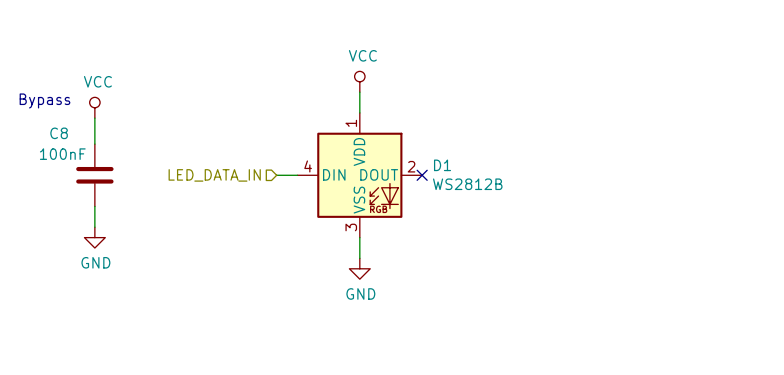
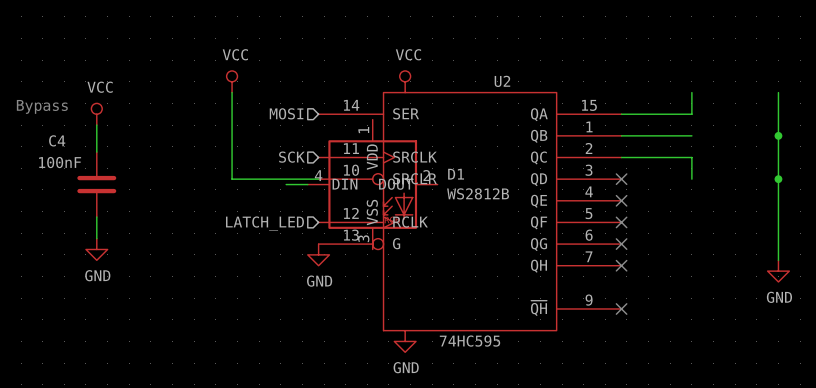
power symbol: none -> VCC (232, 81)
power symbol position: VCC (359, 81) -> VCC (405, 81)
wire: none -> (232, 92) (232, 179) (318, 179)
wire: none -> (691, 92) (691, 114) (621, 114)
wire: none -> (778, 92) (778, 260)
wire: (359, 92) (359, 112) -> none
hierarchical label: none -> MOSI (286, 113)
wire: none -> (621, 135) (691, 135)
junction: none -> (778, 135)
C8 name: C8 (59, 133) -> C4 (57, 140)
hierarchical label: none -> SCK (291, 157)
wire: none -> (621, 157) (691, 157) (691, 179)
no-connect mark: none -> (621, 179)
junction: none -> (778, 179)
hierarchical label: LED_DATA_IN (214, 175) -> none
no-connect mark: (422, 175) -> none
no-connect mark: none -> (621, 200)
U2: none -> 74HC595 (470, 211)
hierarchical label: none -> LATCH_LED (264, 223)
no-connect mark: none -> (621, 222)
no-connect mark: none -> (621, 244)
wire: (359, 237) (359, 258) -> none
power symbol: none -> GND (318, 254)
no-connect mark: none -> (621, 265)
power symbol: none -> GND (778, 271)
power symbol: GND (359, 268) -> none
no-connect mark: none -> (621, 308)
power symbol: none -> GND (405, 341)

